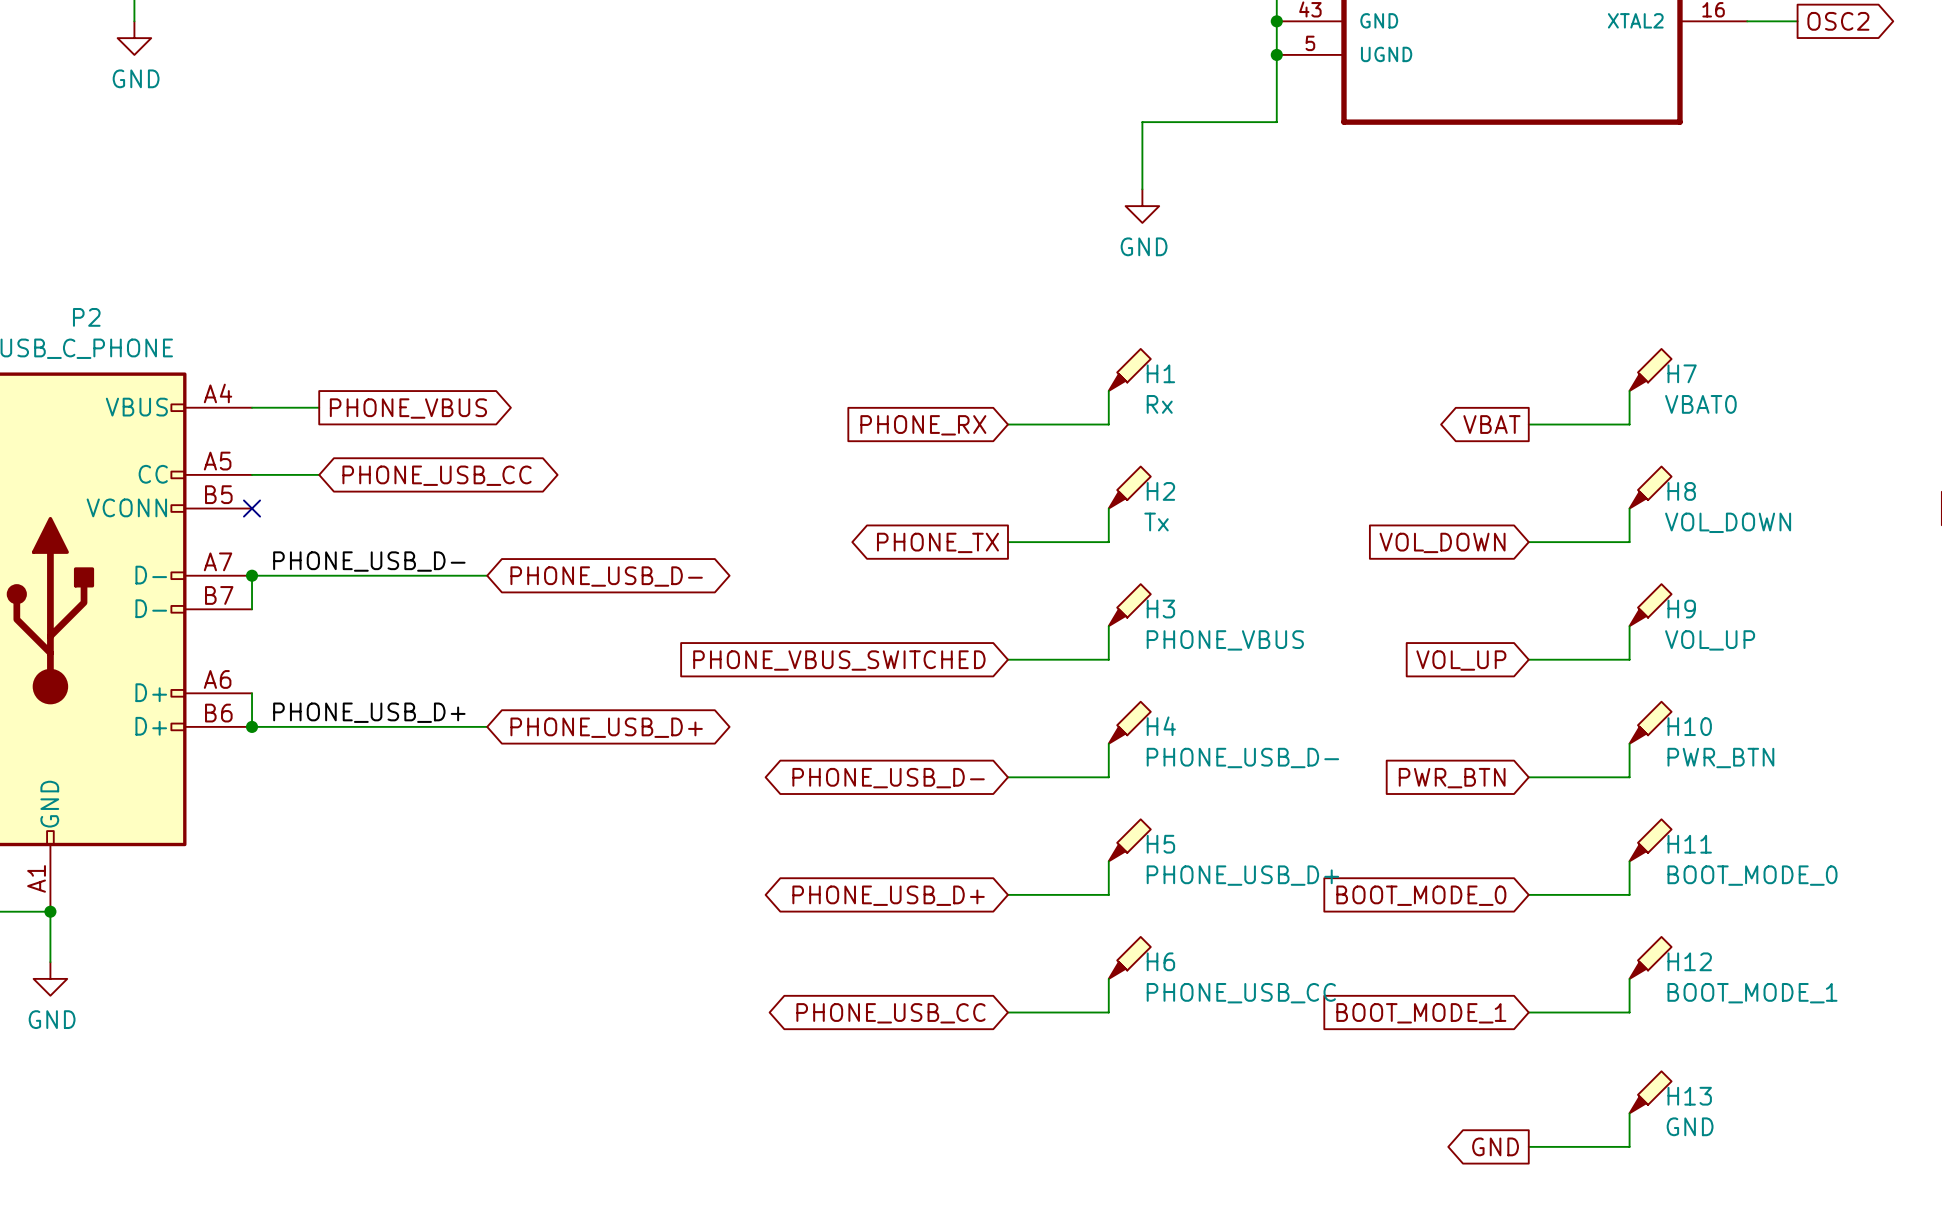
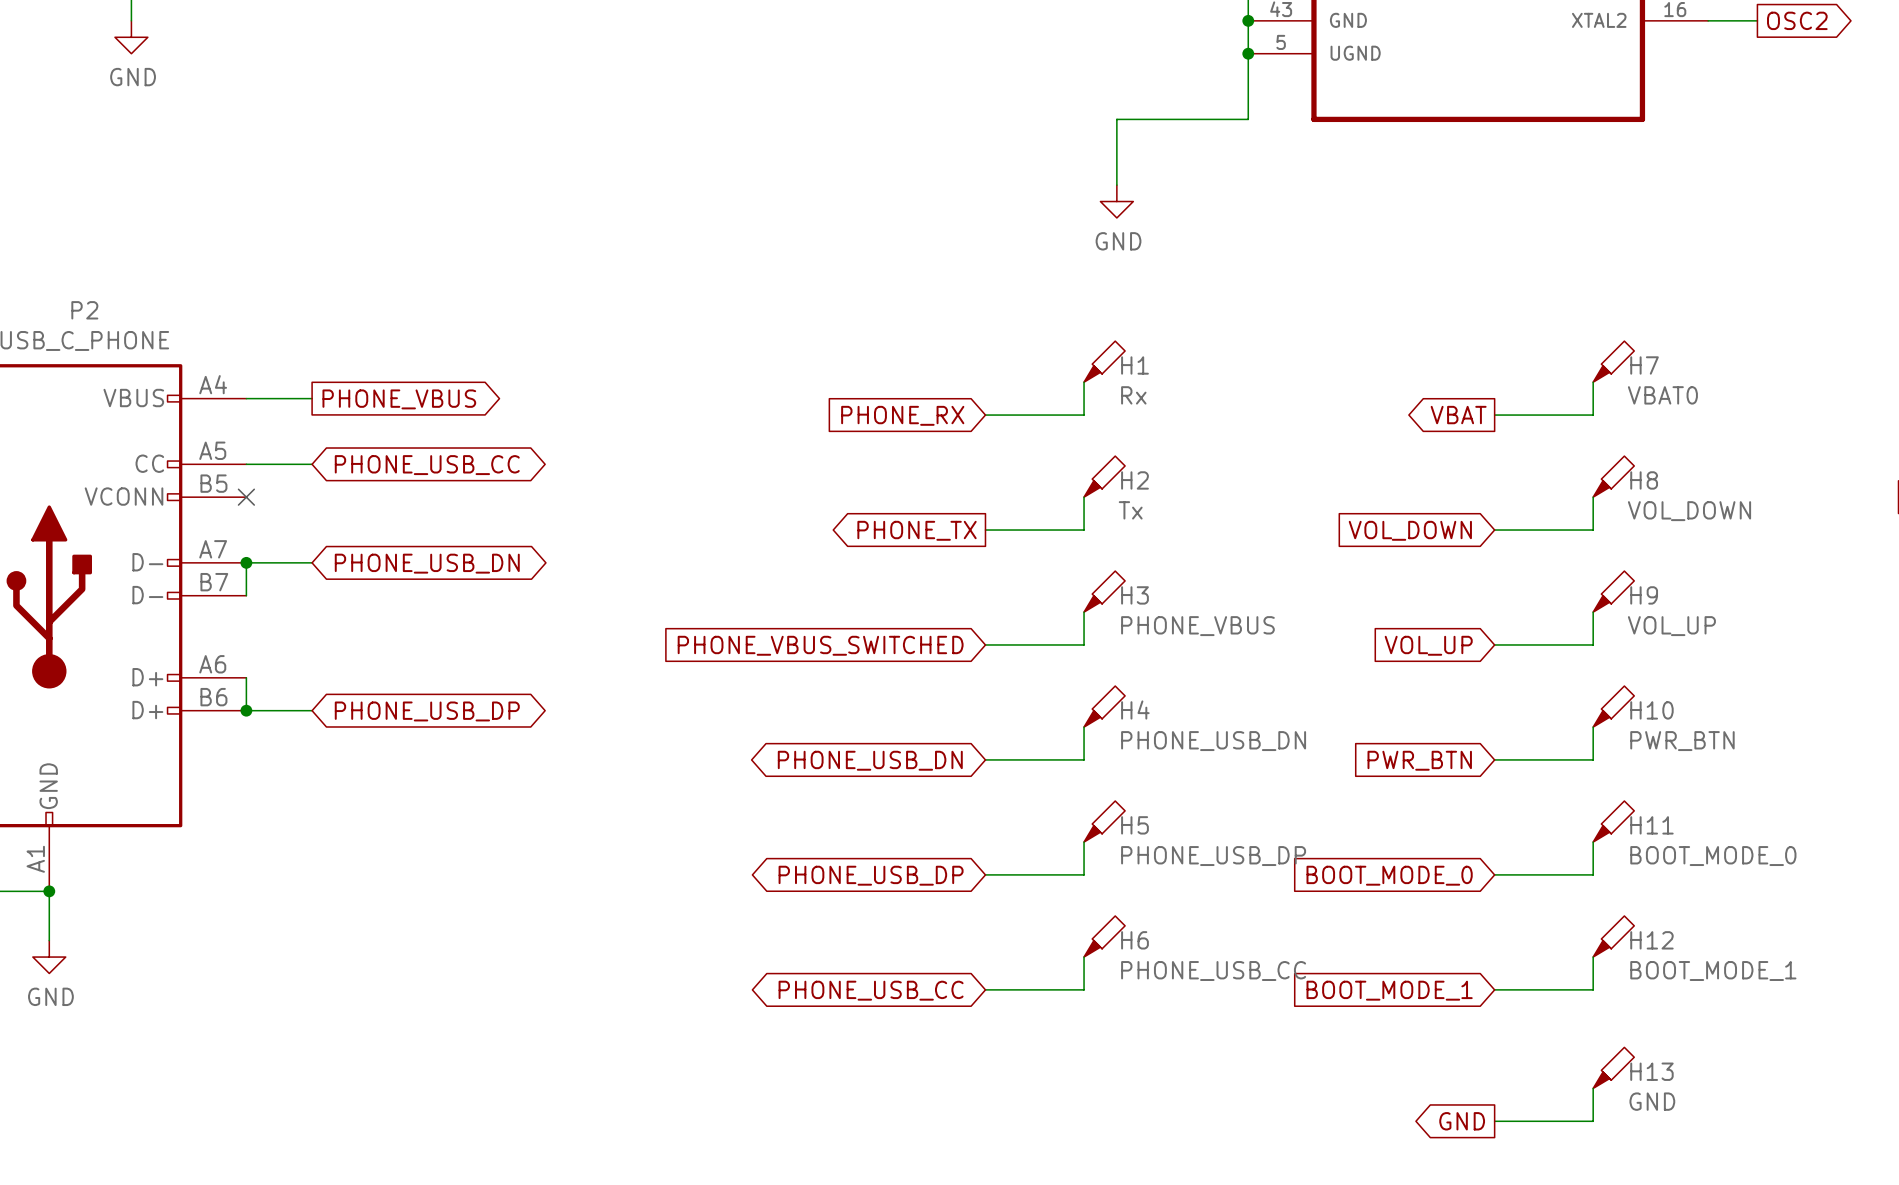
label: PHONE_USB_D- (369, 561) -> none
wire: (319, 575) (487, 575) -> none
global label: PHONE_USB_D- (606, 576) -> PHONE_USB_DN (427, 563)
label: PHONE_USB_D+ (369, 712) -> none
wire: (319, 726) (487, 726) -> none
global label: PHONE_USB_D+ (606, 727) -> PHONE_USB_DP (427, 711)
H4 value: PHONE_USB_D- (1242, 758) -> PHONE_USB_DN (1213, 741)
global label: PHONE_USB_D- (888, 778) -> PHONE_USB_DN (870, 760)
H5 value: PHONE_USB_D+ (1242, 875) -> PHONE_USB_DP (1213, 856)
global label: PHONE_USB_D+ (888, 895) -> PHONE_USB_DP (871, 875)

